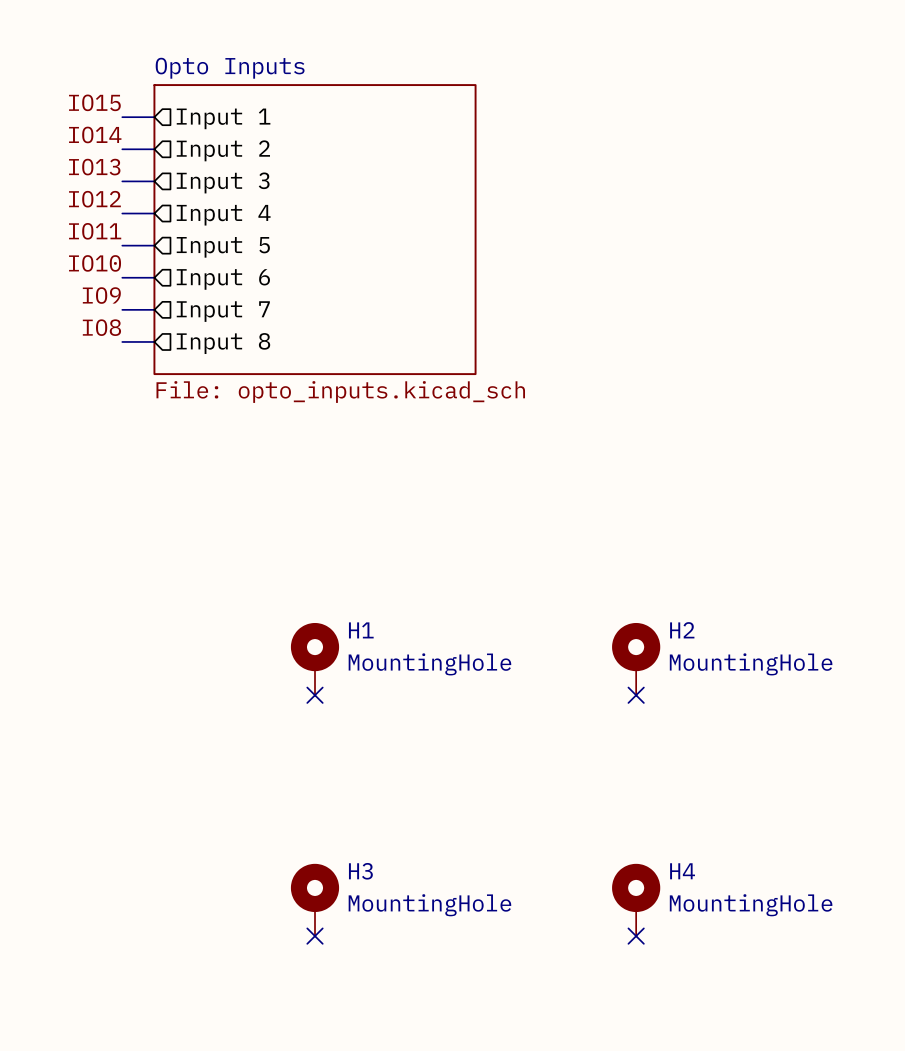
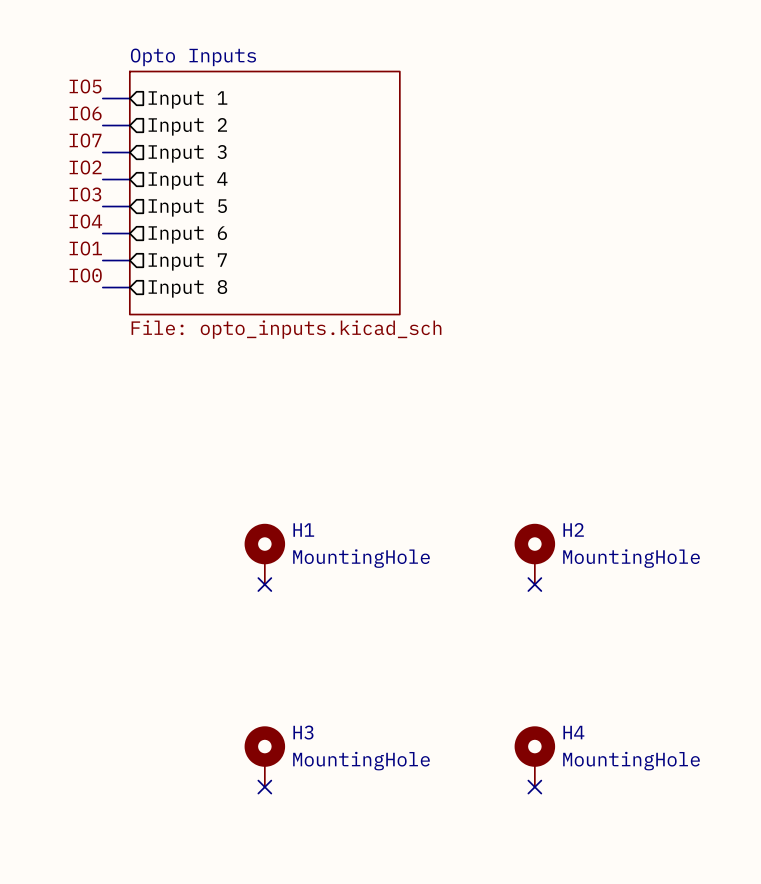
label: IO15 (94, 102) -> IO5 (85, 86)
label: IO14 (95, 134) -> IO6 (85, 113)
label: IO13 (94, 167) -> IO7 (85, 140)
label: IO12 (94, 199) -> IO2 (85, 167)
label: IO11 (95, 231) -> IO3 (85, 194)
label: IO10 (95, 263) -> IO4 (85, 221)
label: IO9 (101, 295) -> IO1 (85, 248)
label: IO8 (101, 327) -> IO0 (85, 275)

